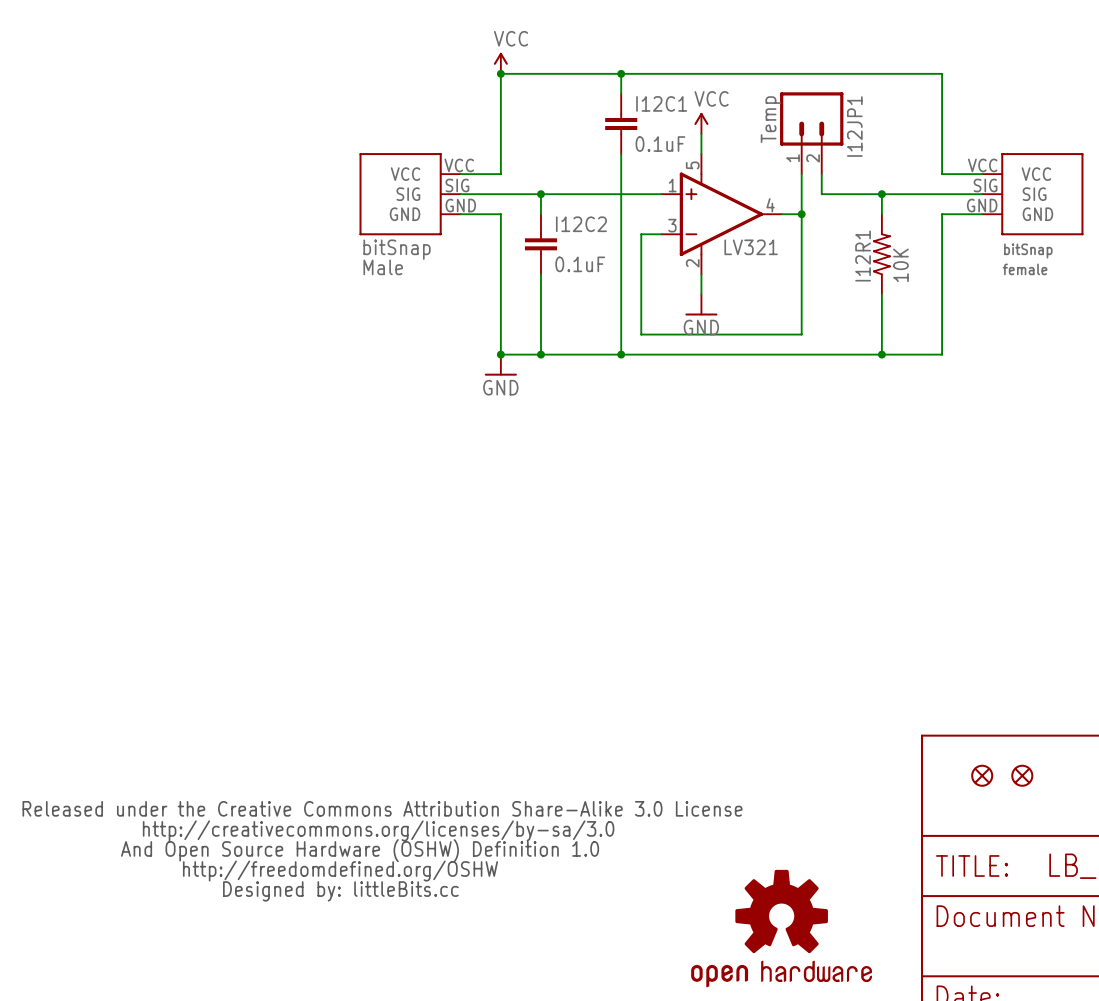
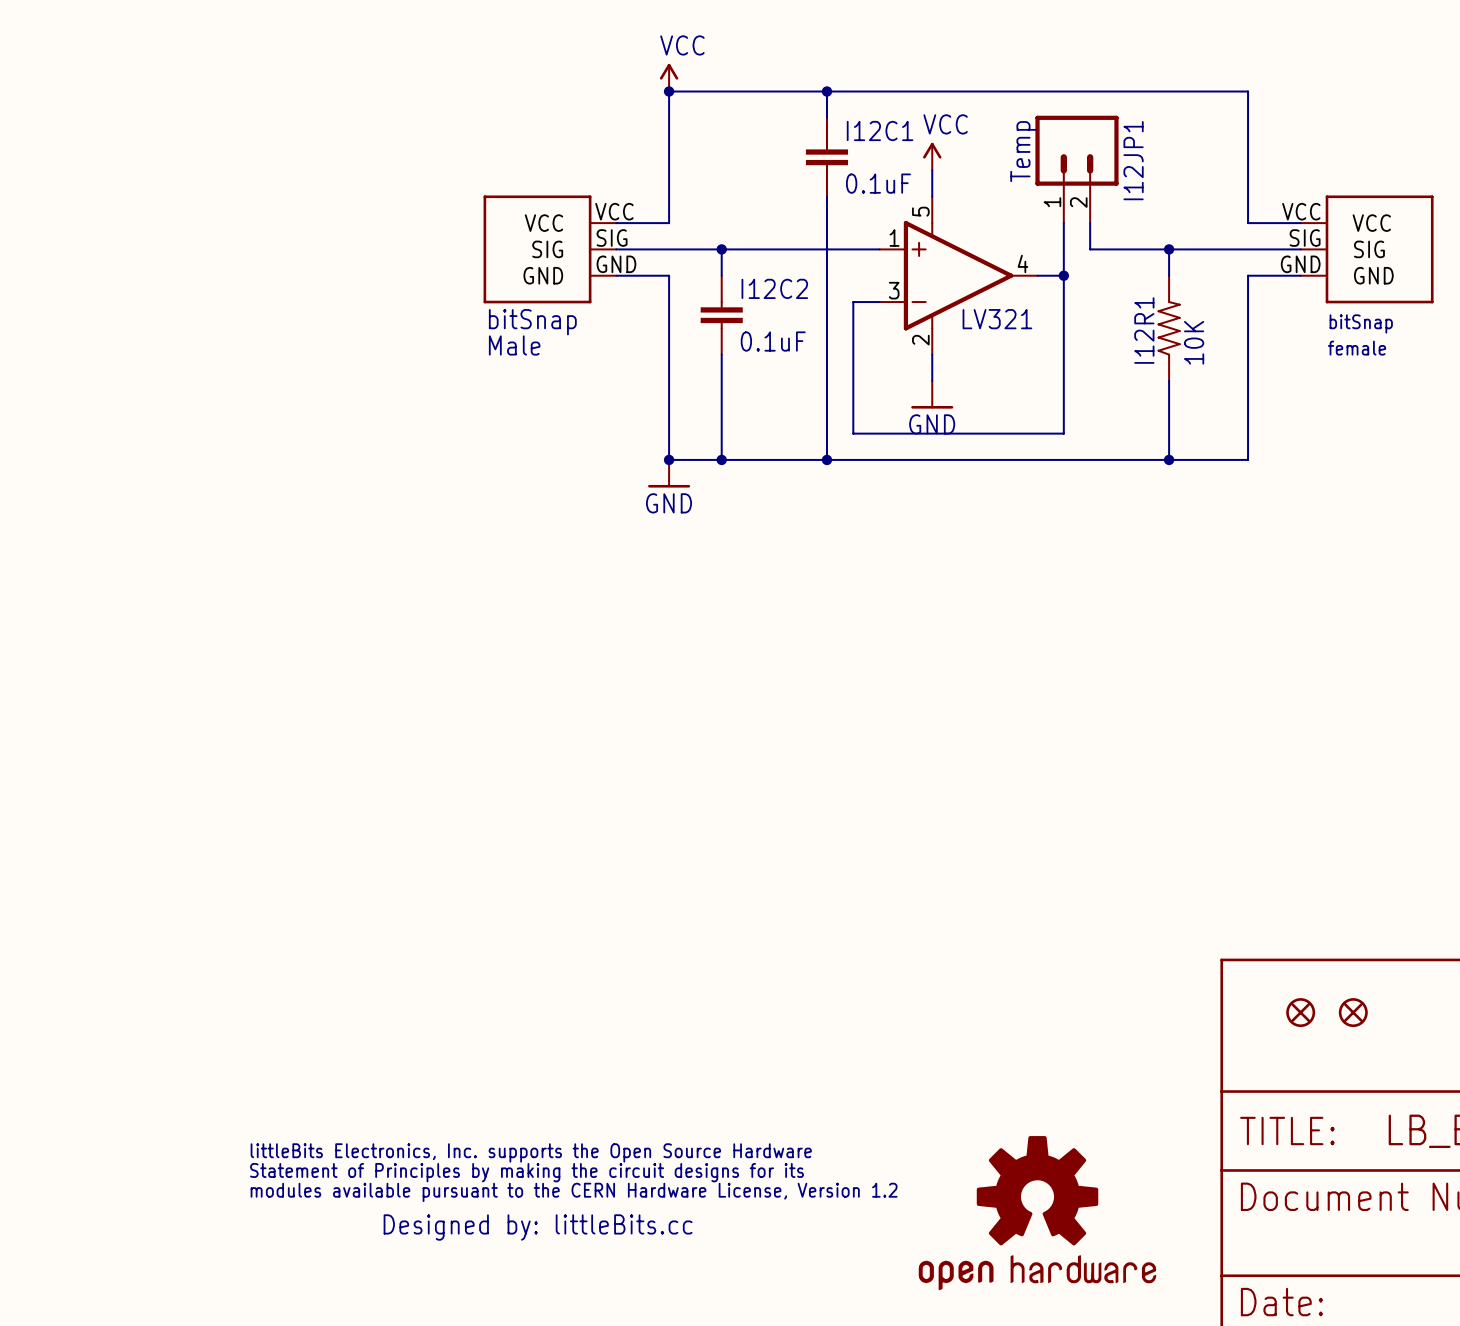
part: (382, 851) -> none
part: none -> (573, 1192)

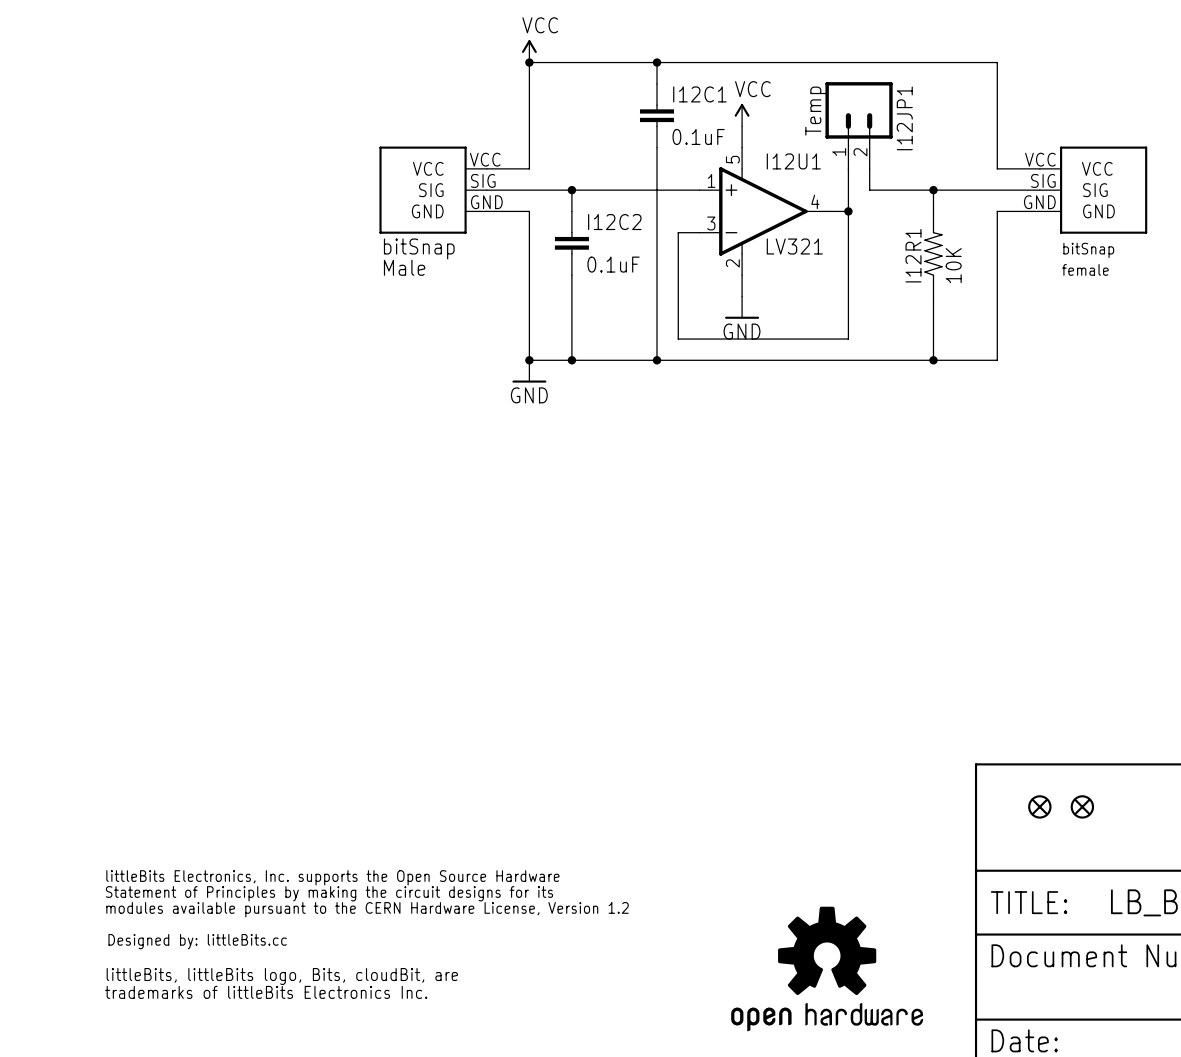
I12U1 name: none -> I12U1 (793, 161)
part: none -> (366, 934)
part: (573, 1192) -> none

